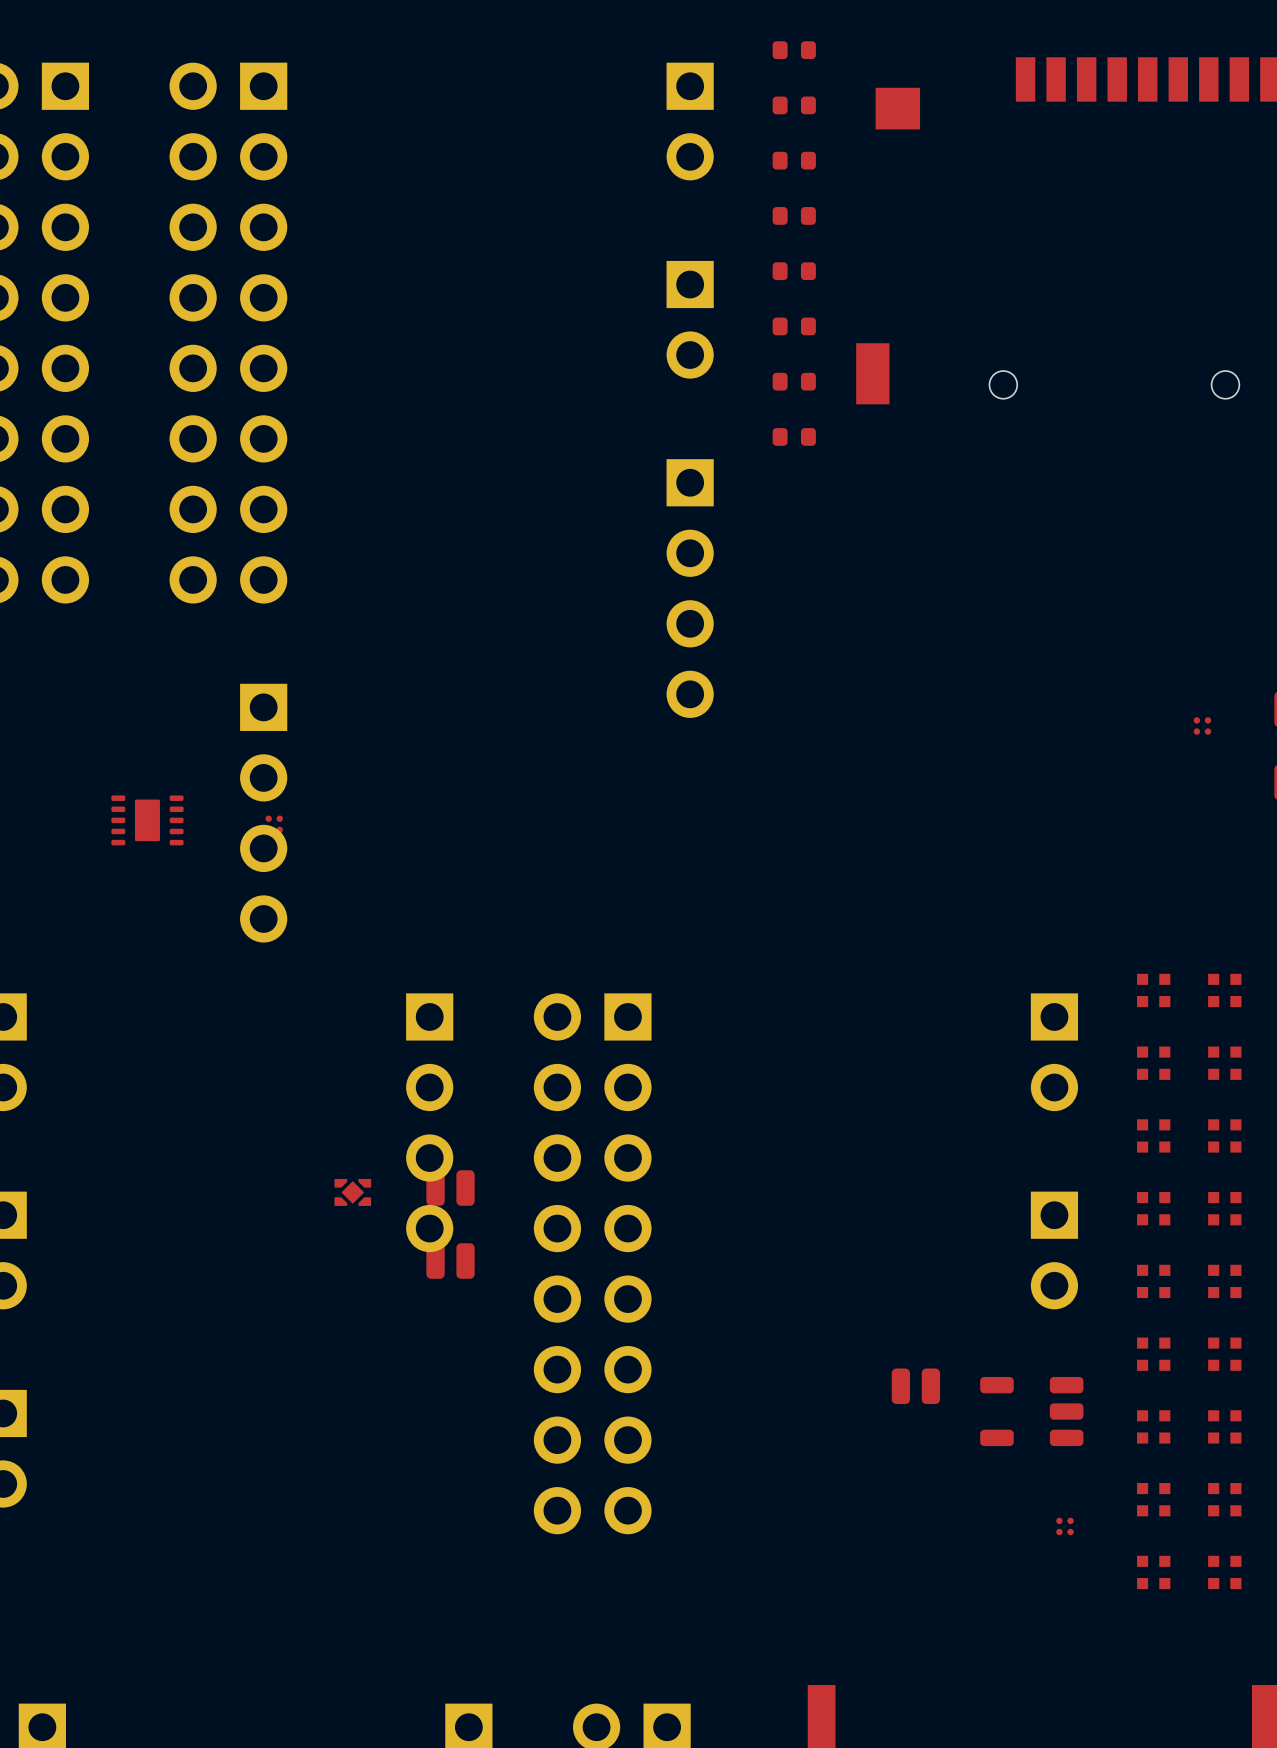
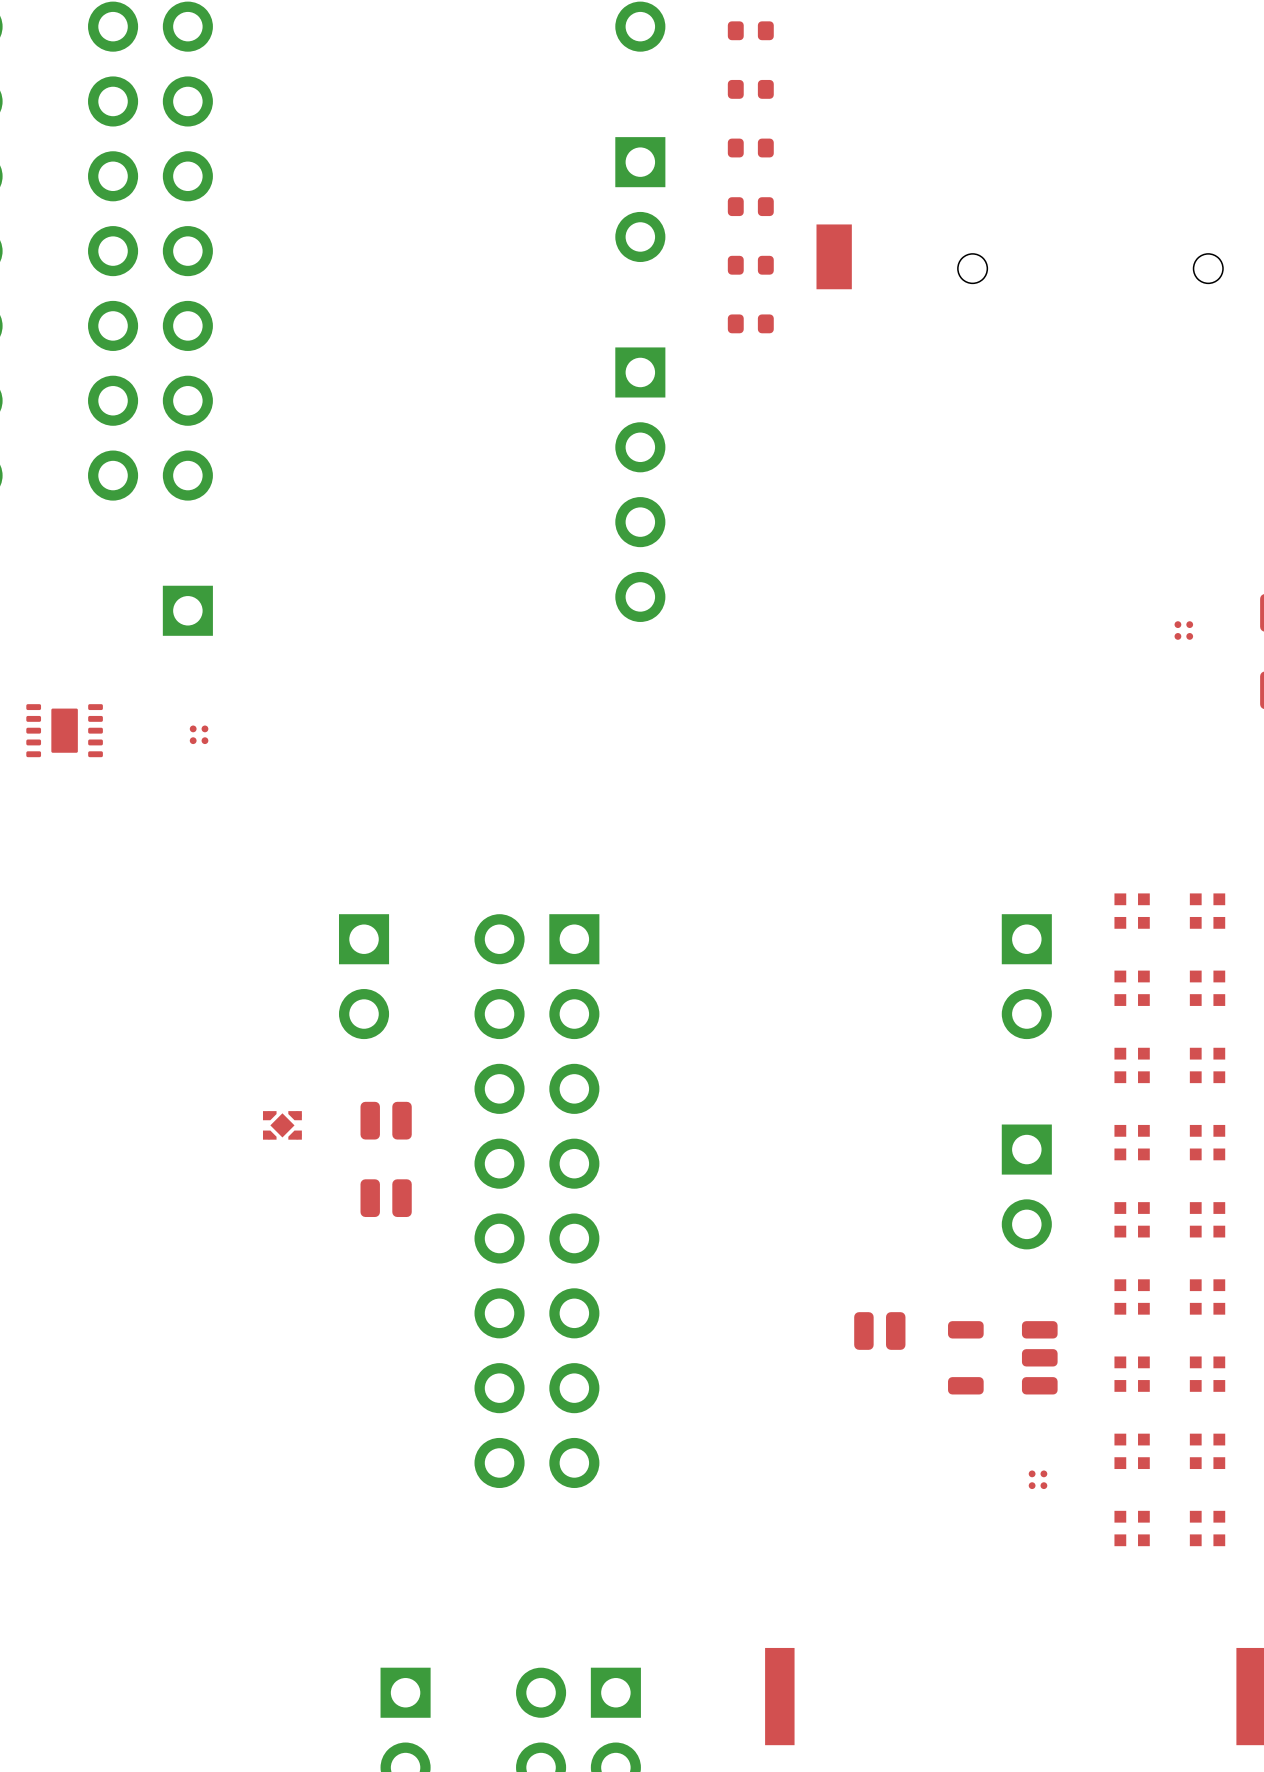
part: (263, 813) -> none
part: (429, 1122) -> none

